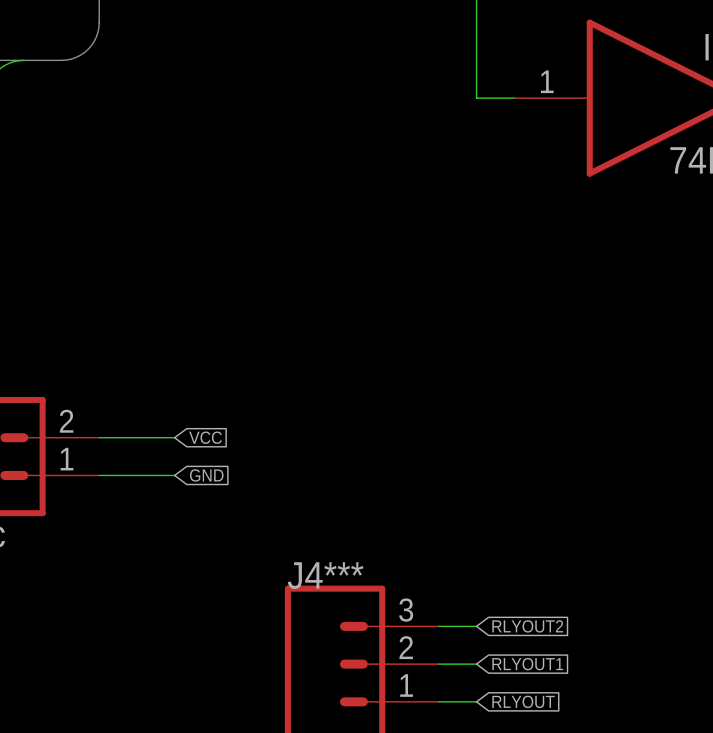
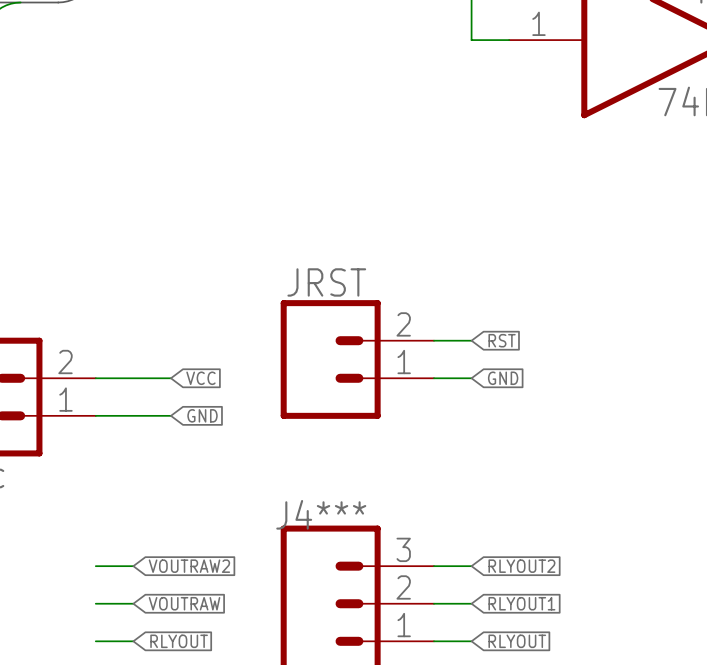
wire: none -> (434, 340) (471, 340)
global label: none -> RST (502, 340)
JRST: none -> (357, 359)
wire: none -> (434, 378) (471, 378)
global label: none -> GND (503, 378)
wire: none -> (95, 566) (133, 566)
global label: none -> VOUTRAW2 (189, 566)
wire: none -> (95, 603) (133, 603)
global label: none -> VOUTRAW (184, 603)
wire: none -> (95, 641) (133, 641)
global label: none -> RLYOUT (179, 641)

